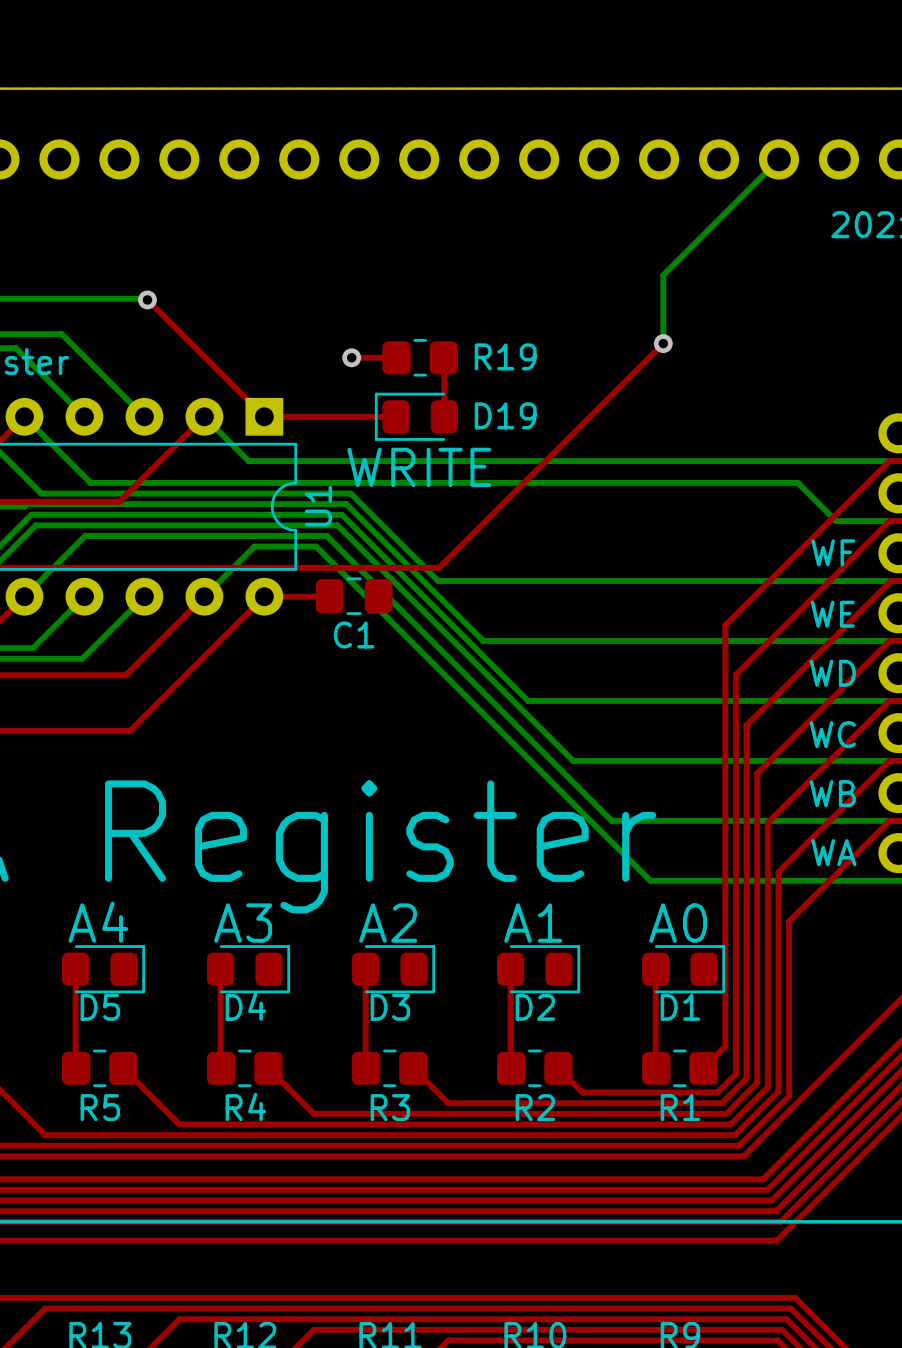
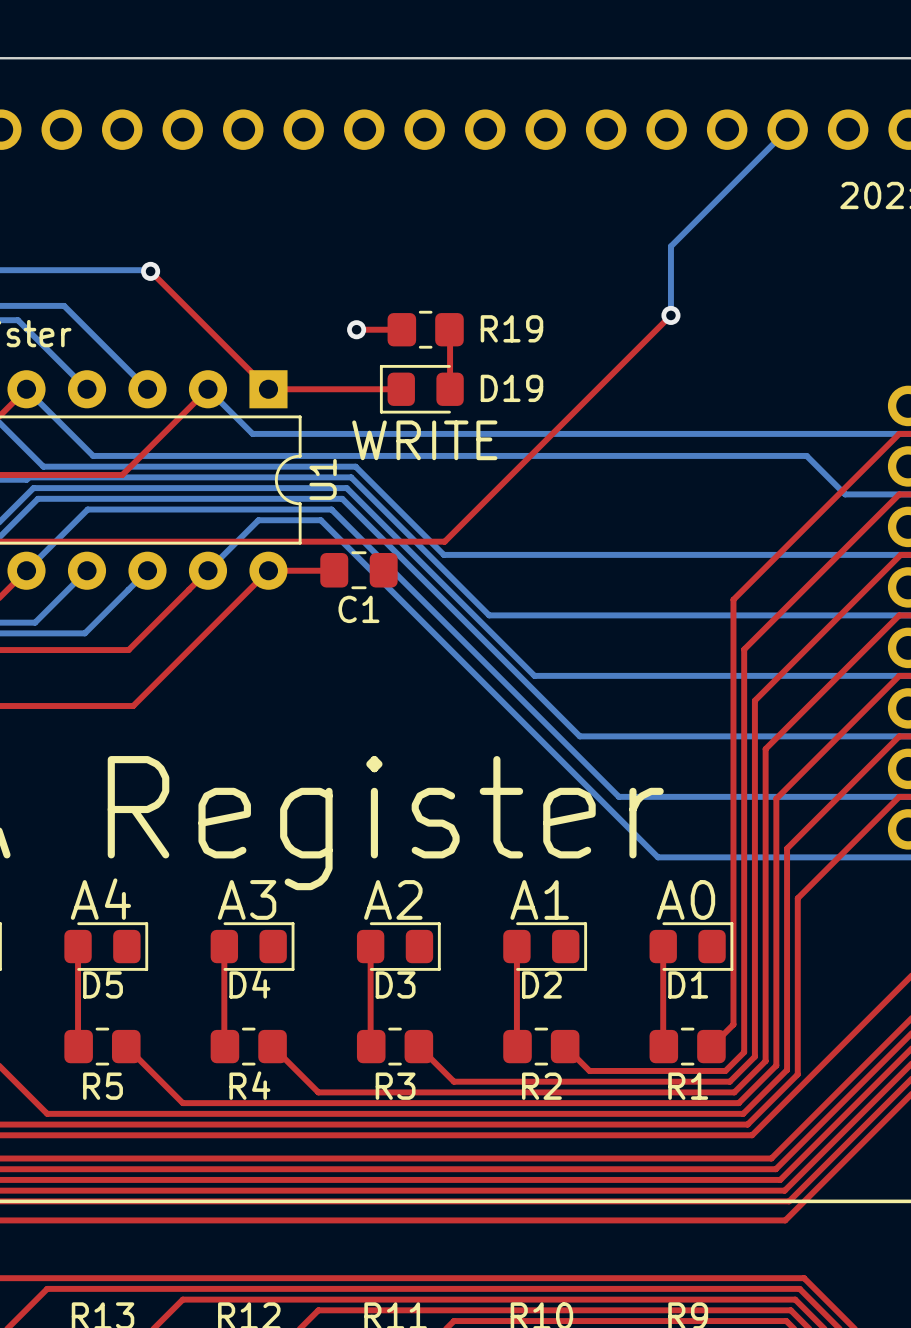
text: WF (833, 552) -> none
text: WE (832, 614) -> none
text: WD (832, 673) -> none
text: WC (832, 734) -> none
text: WB (832, 793) -> none
text: WA (833, 852) -> none

